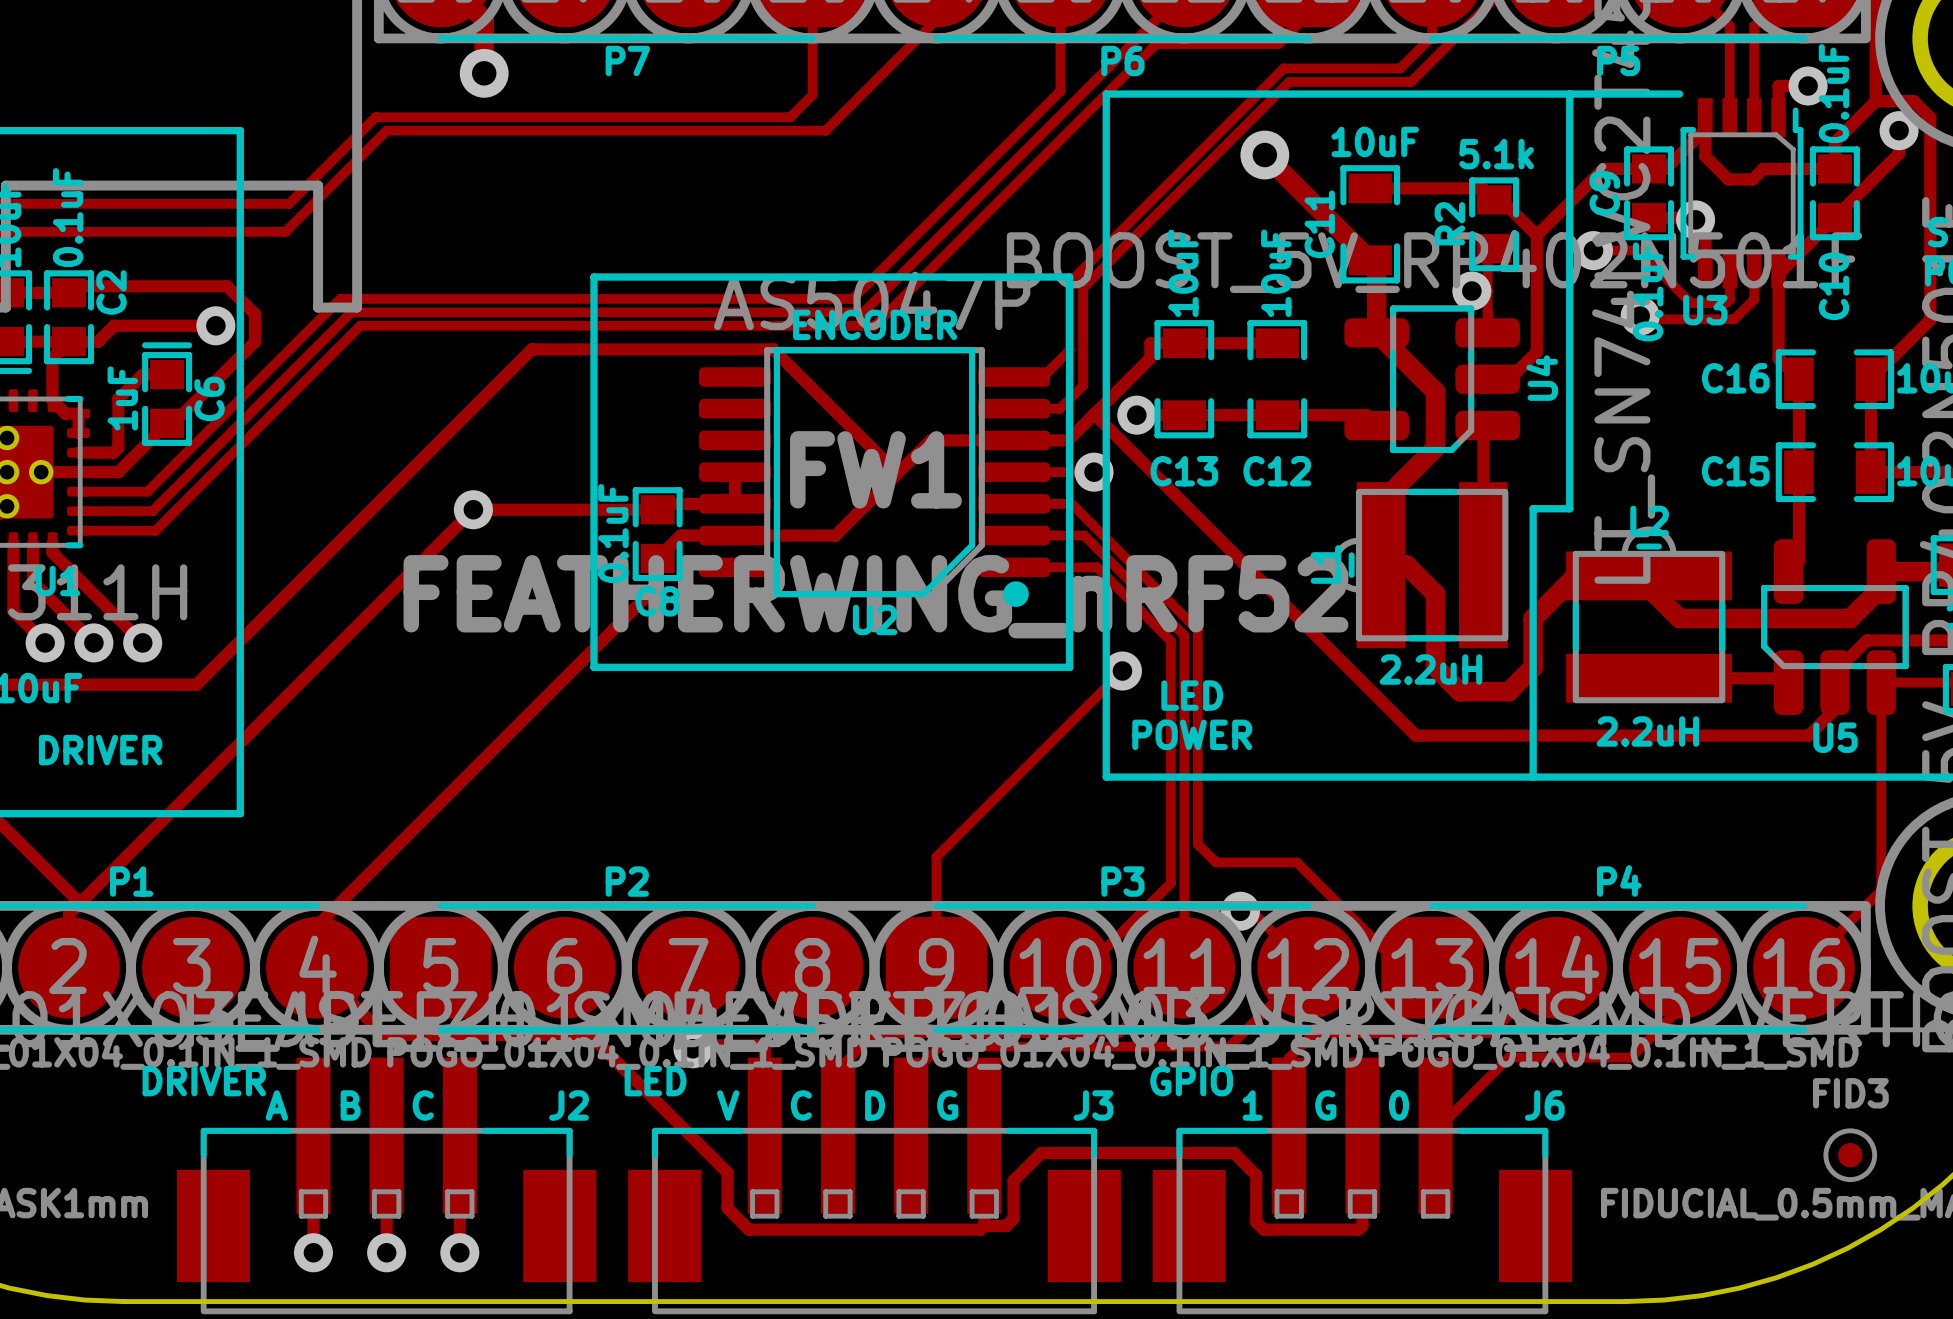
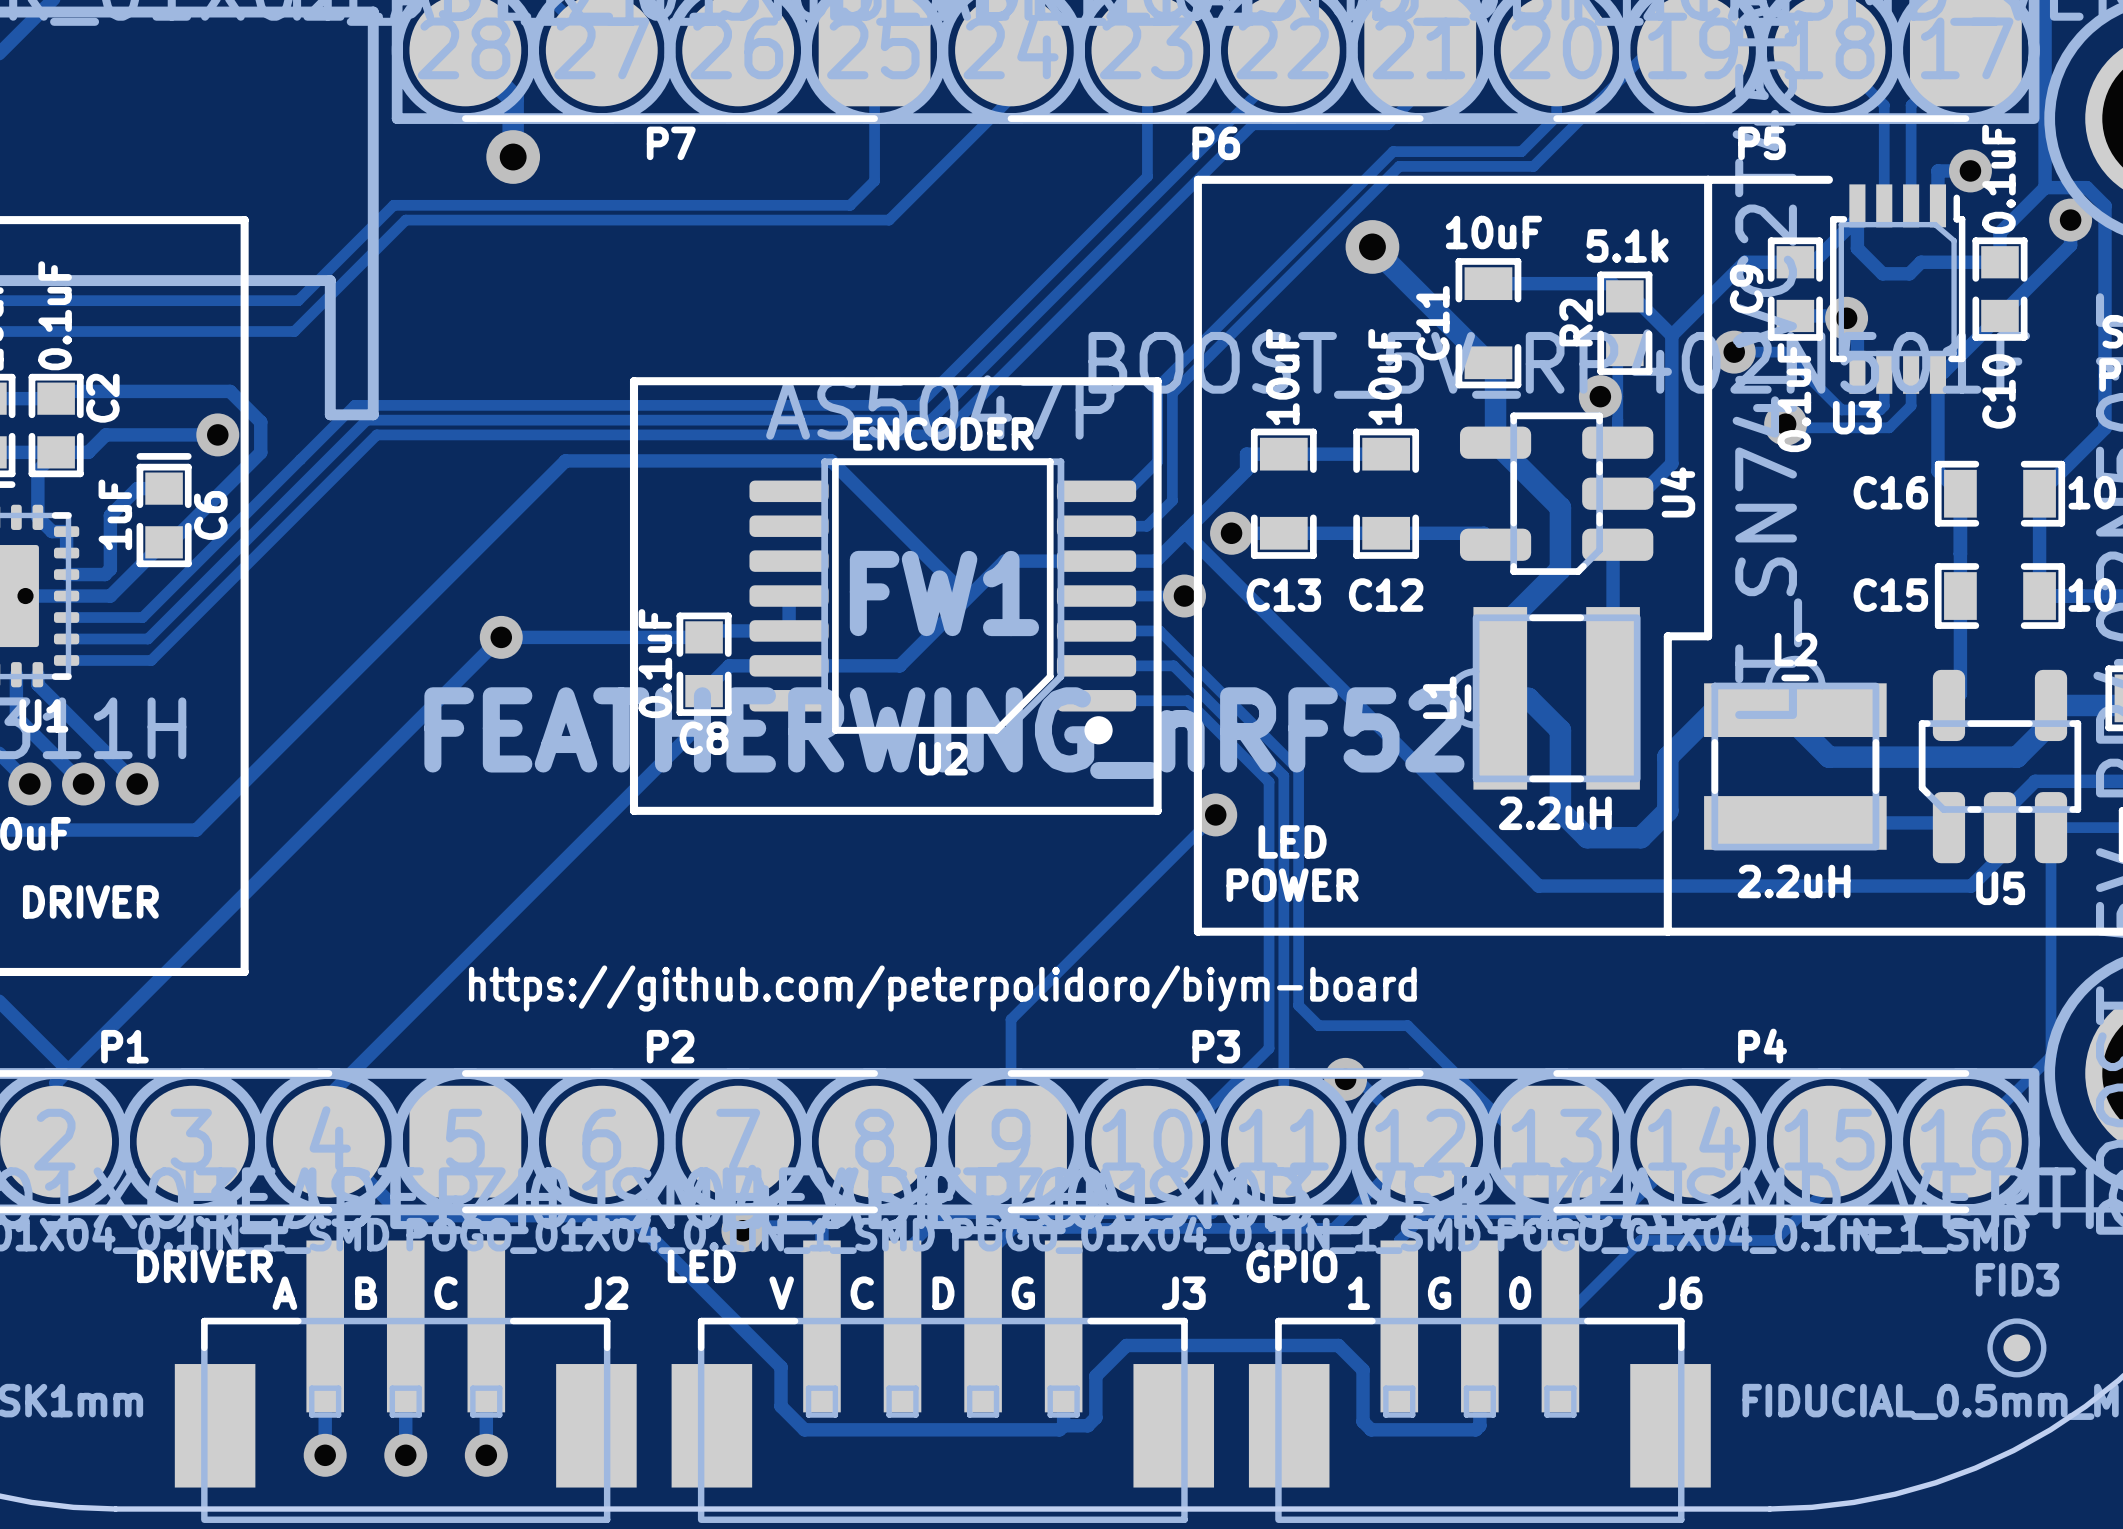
text: none -> https://github.com/peterpolidoro/biym-board (942, 988)

